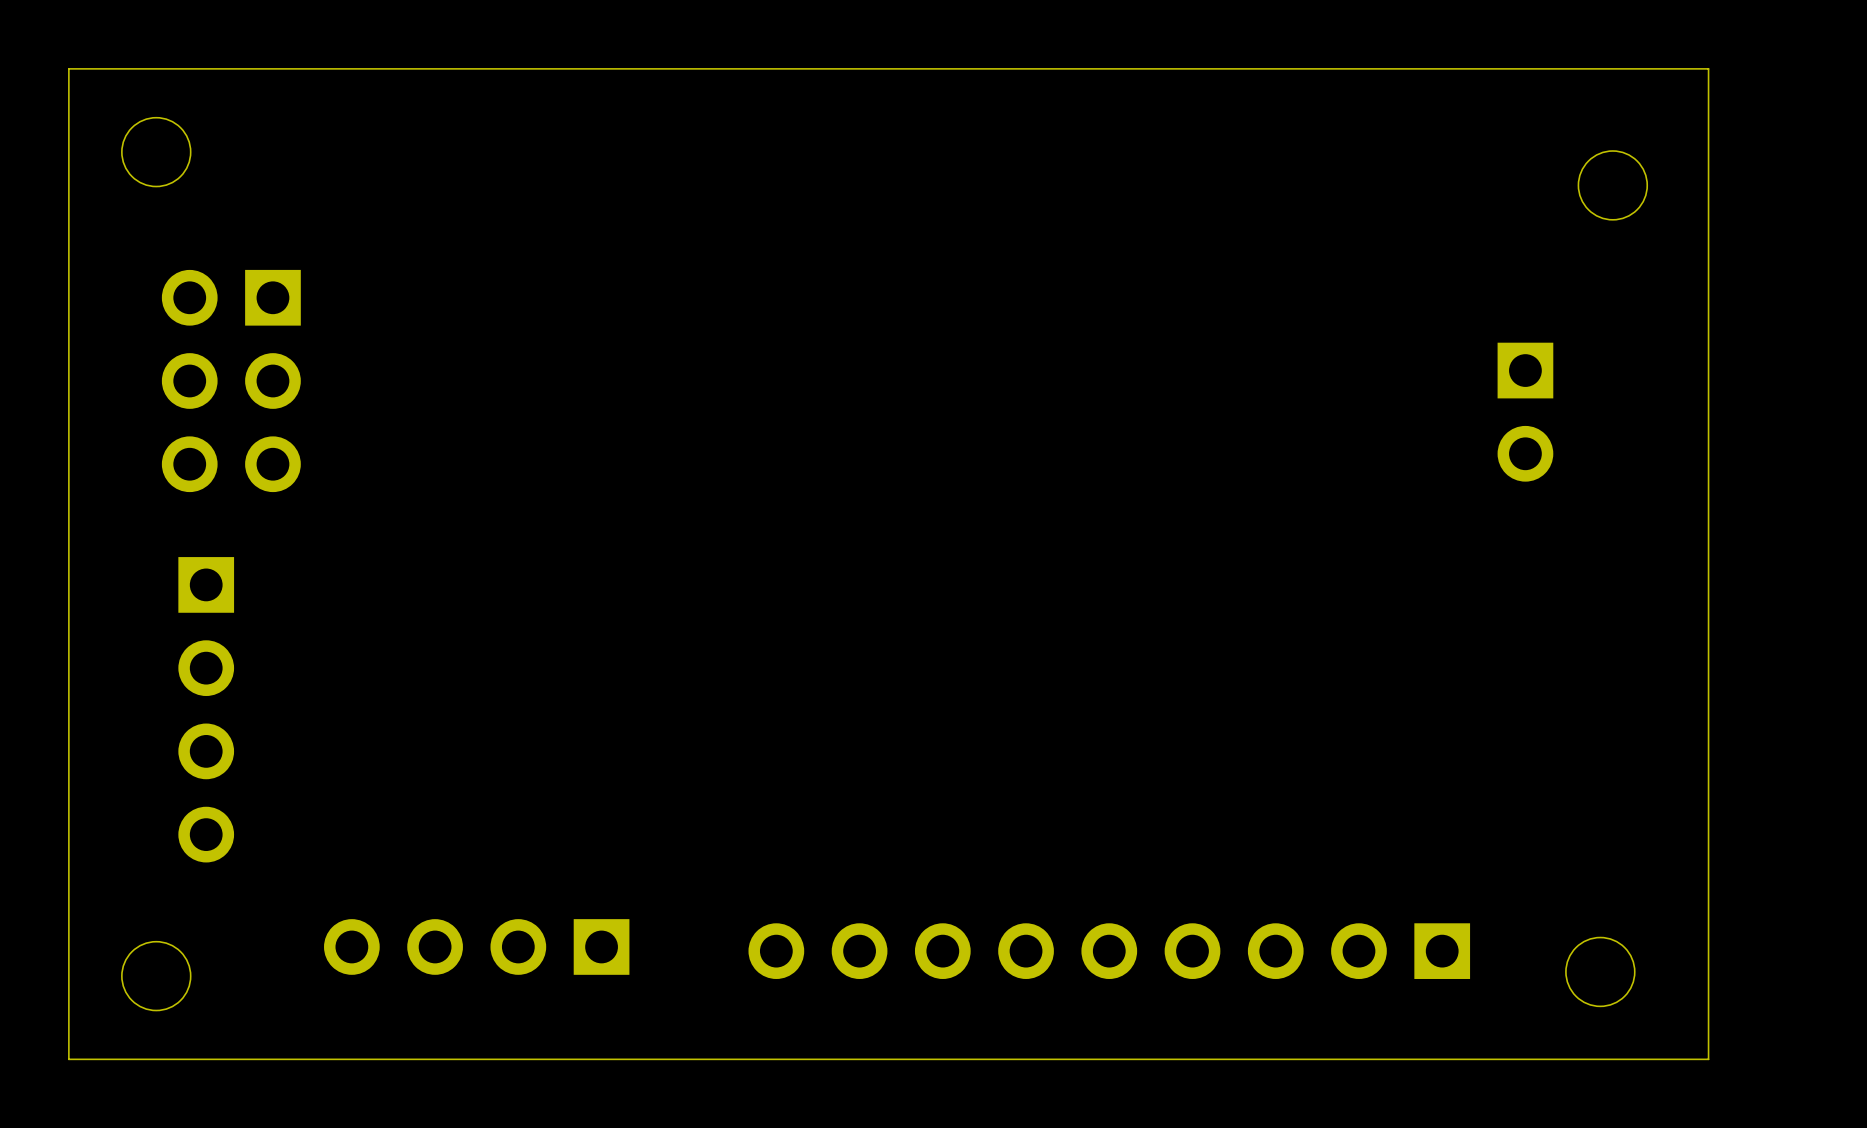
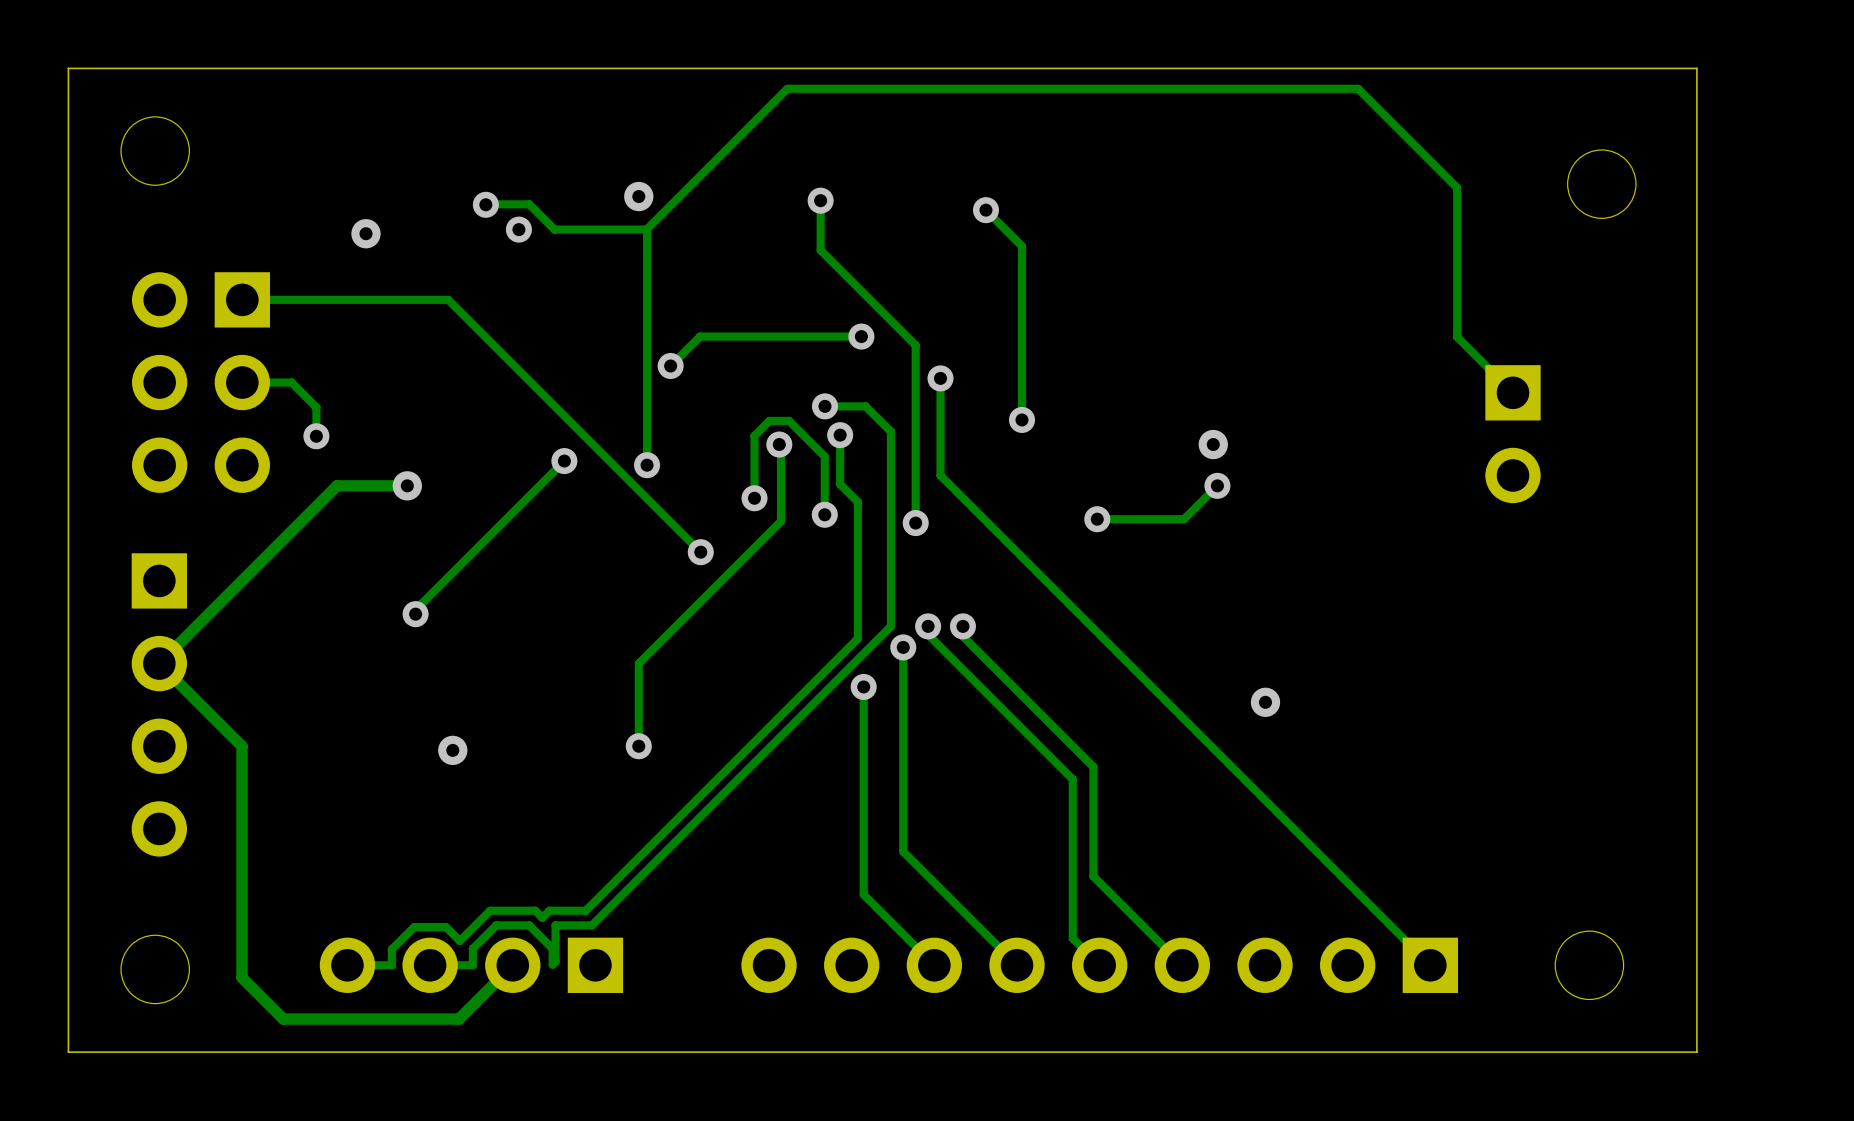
via: none -> (638, 196)
track: none -> (820, 200) (820, 250) (915, 345) (915, 523)
via: none -> (820, 200)
track: none -> (486, 204) (529, 204) (554, 229) (647, 229)
via: none -> (485, 204)
track: none -> (985, 210) (1021, 246) (1021, 419)
via: none -> (985, 210)
via: none -> (518, 229)
via: none -> (366, 233)
track: none -> (242, 299) (448, 299) (700, 552)
track: none -> (861, 336) (700, 336) (670, 366)
via: none -> (861, 336)
via: none -> (670, 366)
part position: (231, 381) -> (201, 382)
track: none -> (940, 378) (940, 475) (1430, 965)
via: none -> (940, 378)
track: none -> (242, 382) (291, 382) (316, 407) (316, 436)
track: none -> (1512, 392) (1457, 336) (1457, 187) (1358, 88) (787, 88) (647, 229) (647, 465)
track: none -> (824, 406) (865, 406) (890, 431) (890, 626) (591, 925) (555, 925) (555, 961) (552, 964) (552, 948) (529, 925) (496, 925) (472, 948) (472, 965) (430, 965)
via: none -> (824, 406)
part position: (1525, 412) -> (1512, 434)
via: none -> (1021, 419)
track: none -> (840, 435) (840, 484) (857, 501) (857, 638) (585, 910) (549, 910) (542, 917) (535, 910) (490, 910) (459, 940) (445, 927) (414, 927) (391, 949) (391, 965) (347, 965)
via: none -> (840, 435)
via: none -> (316, 436)
track: none -> (779, 444) (781, 446) (781, 521) (638, 663) (638, 746)
via: none -> (779, 444)
via: none -> (1213, 444)
track: none -> (564, 461) (415, 609) (415, 614)
via: none -> (564, 461)
via: none -> (647, 465)
track: none -> (407, 485) (337, 485) (159, 663) (242, 746) (242, 977) (283, 1019) (459, 1019) (512, 965)
via: none -> (407, 485)
track: none -> (1217, 485) (1184, 519) (1097, 519)
via: none -> (1217, 485)
track: none -> (754, 498) (754, 435) (769, 420) (789, 420) (824, 456) (824, 514)
via: none -> (754, 498)
via: none -> (824, 514)
via: none -> (1097, 519)
via: none -> (915, 523)
via: none -> (700, 552)
via: none -> (415, 614)
track: none -> (928, 626) (928, 634) (1072, 779) (1072, 938) (1099, 965)
via: none -> (928, 626)
track: none -> (962, 626) (962, 636) (1093, 766) (1093, 876) (1182, 965)
via: none -> (962, 626)
track: none -> (903, 647) (903, 851) (1017, 965)
via: none -> (903, 647)
track: none -> (863, 686) (863, 894) (934, 965)
via: none -> (863, 686)
via: none -> (1265, 702)
part position: (206, 709) -> (159, 704)
via: none -> (638, 746)
via: none -> (452, 750)
part position: (476, 946) -> (471, 965)
part position: (1109, 951) -> (1099, 965)

